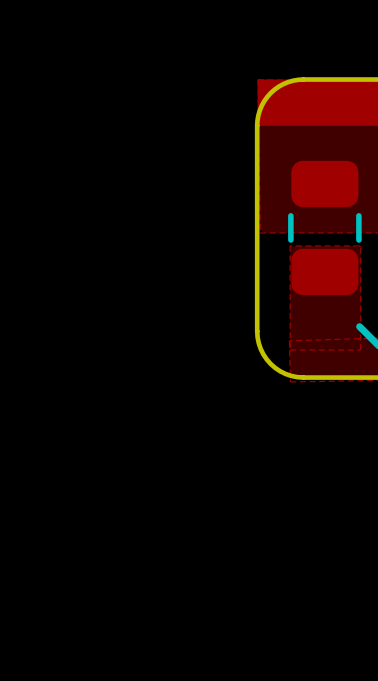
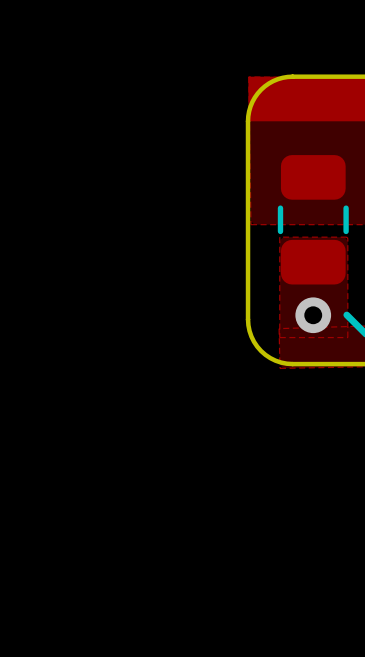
via: none -> (313, 315)

